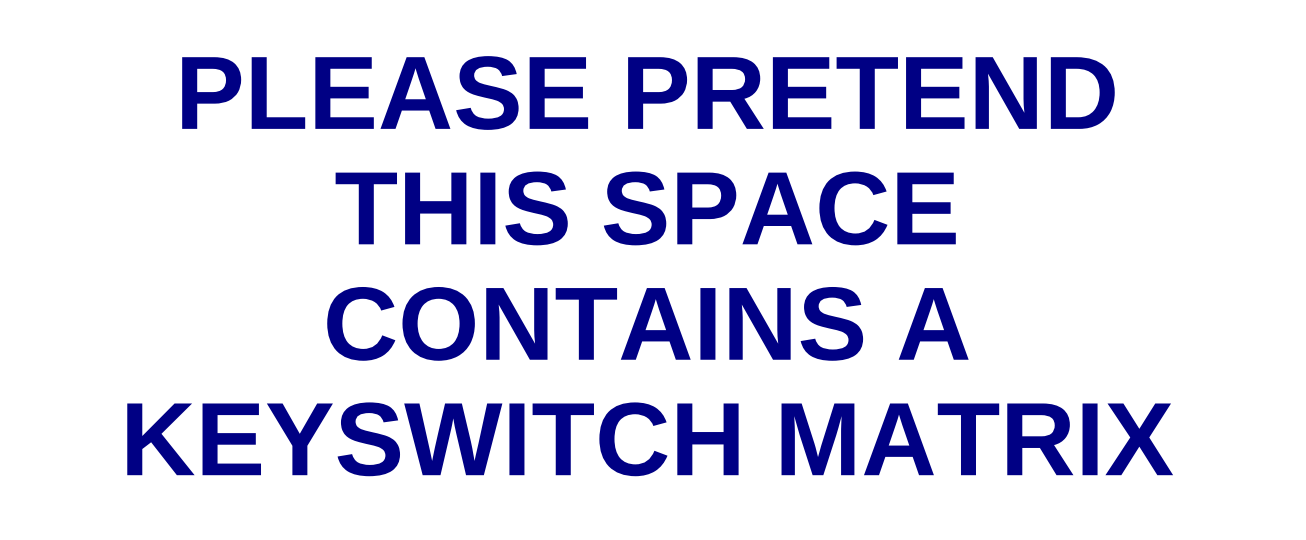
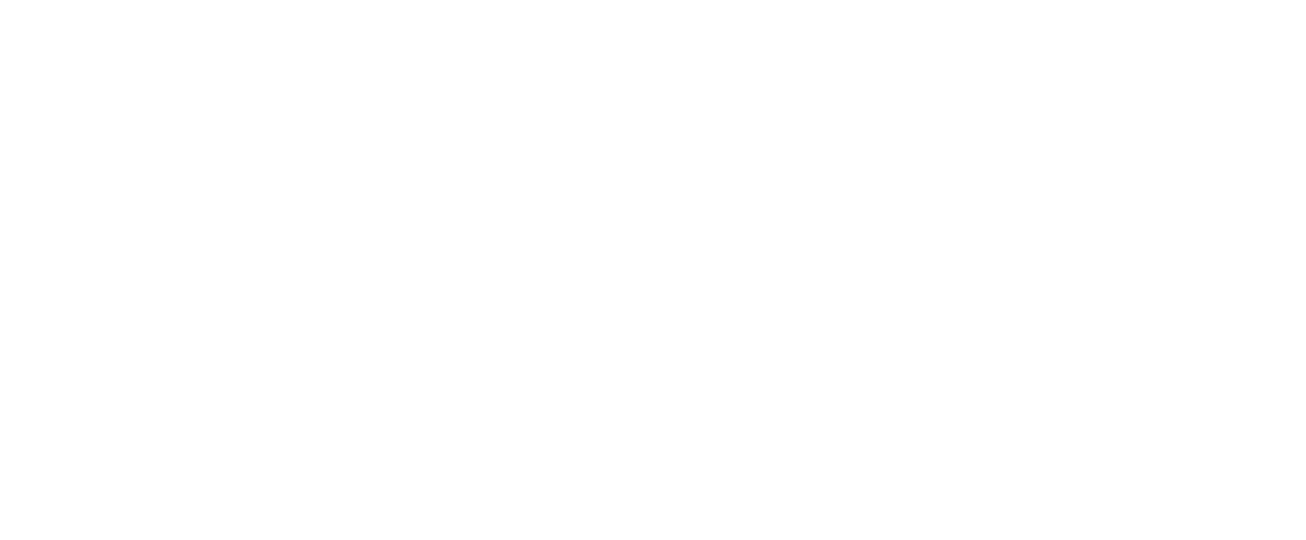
text: PLEASE PRETEND (648, 93) -> none
text: THIS SPACE (645, 208) -> none
text: CONTAINS A (647, 323) -> none
text: KEYSWITCH MATRIX (650, 439) -> none

